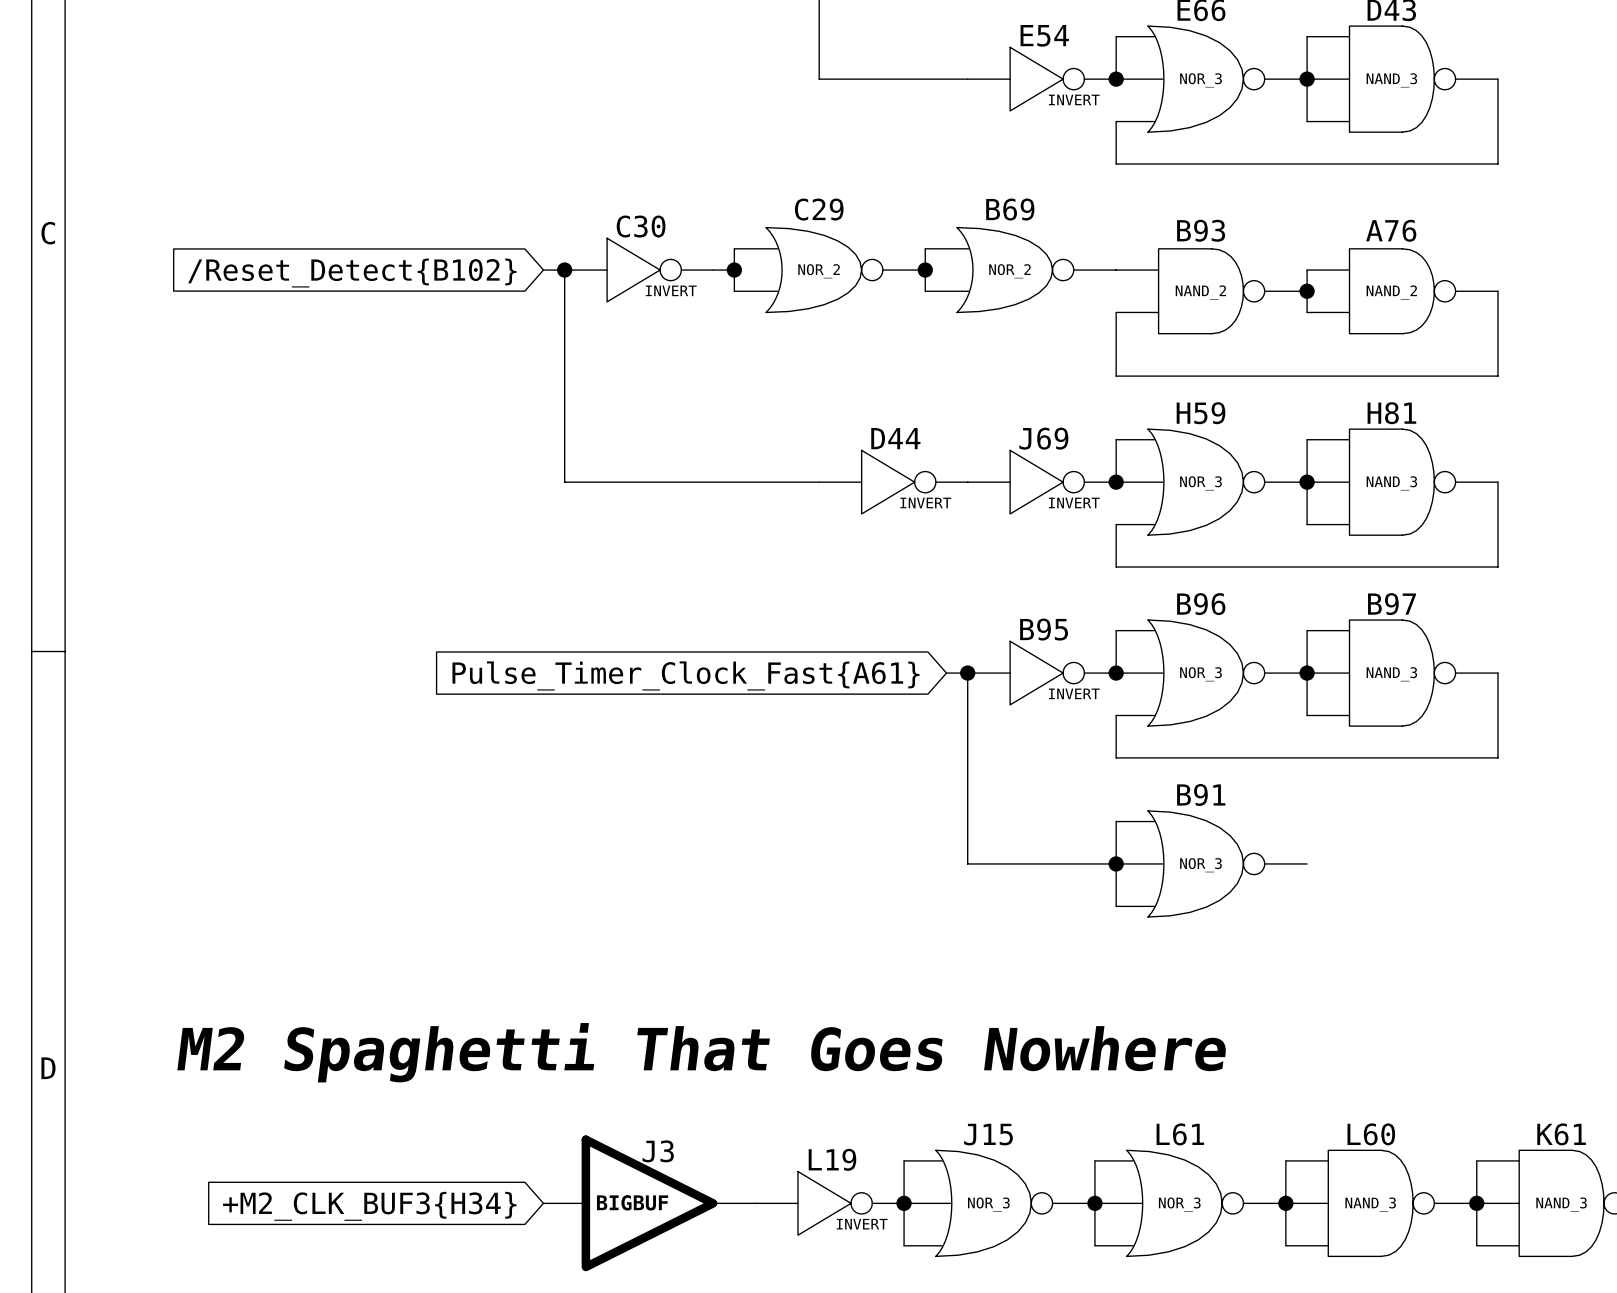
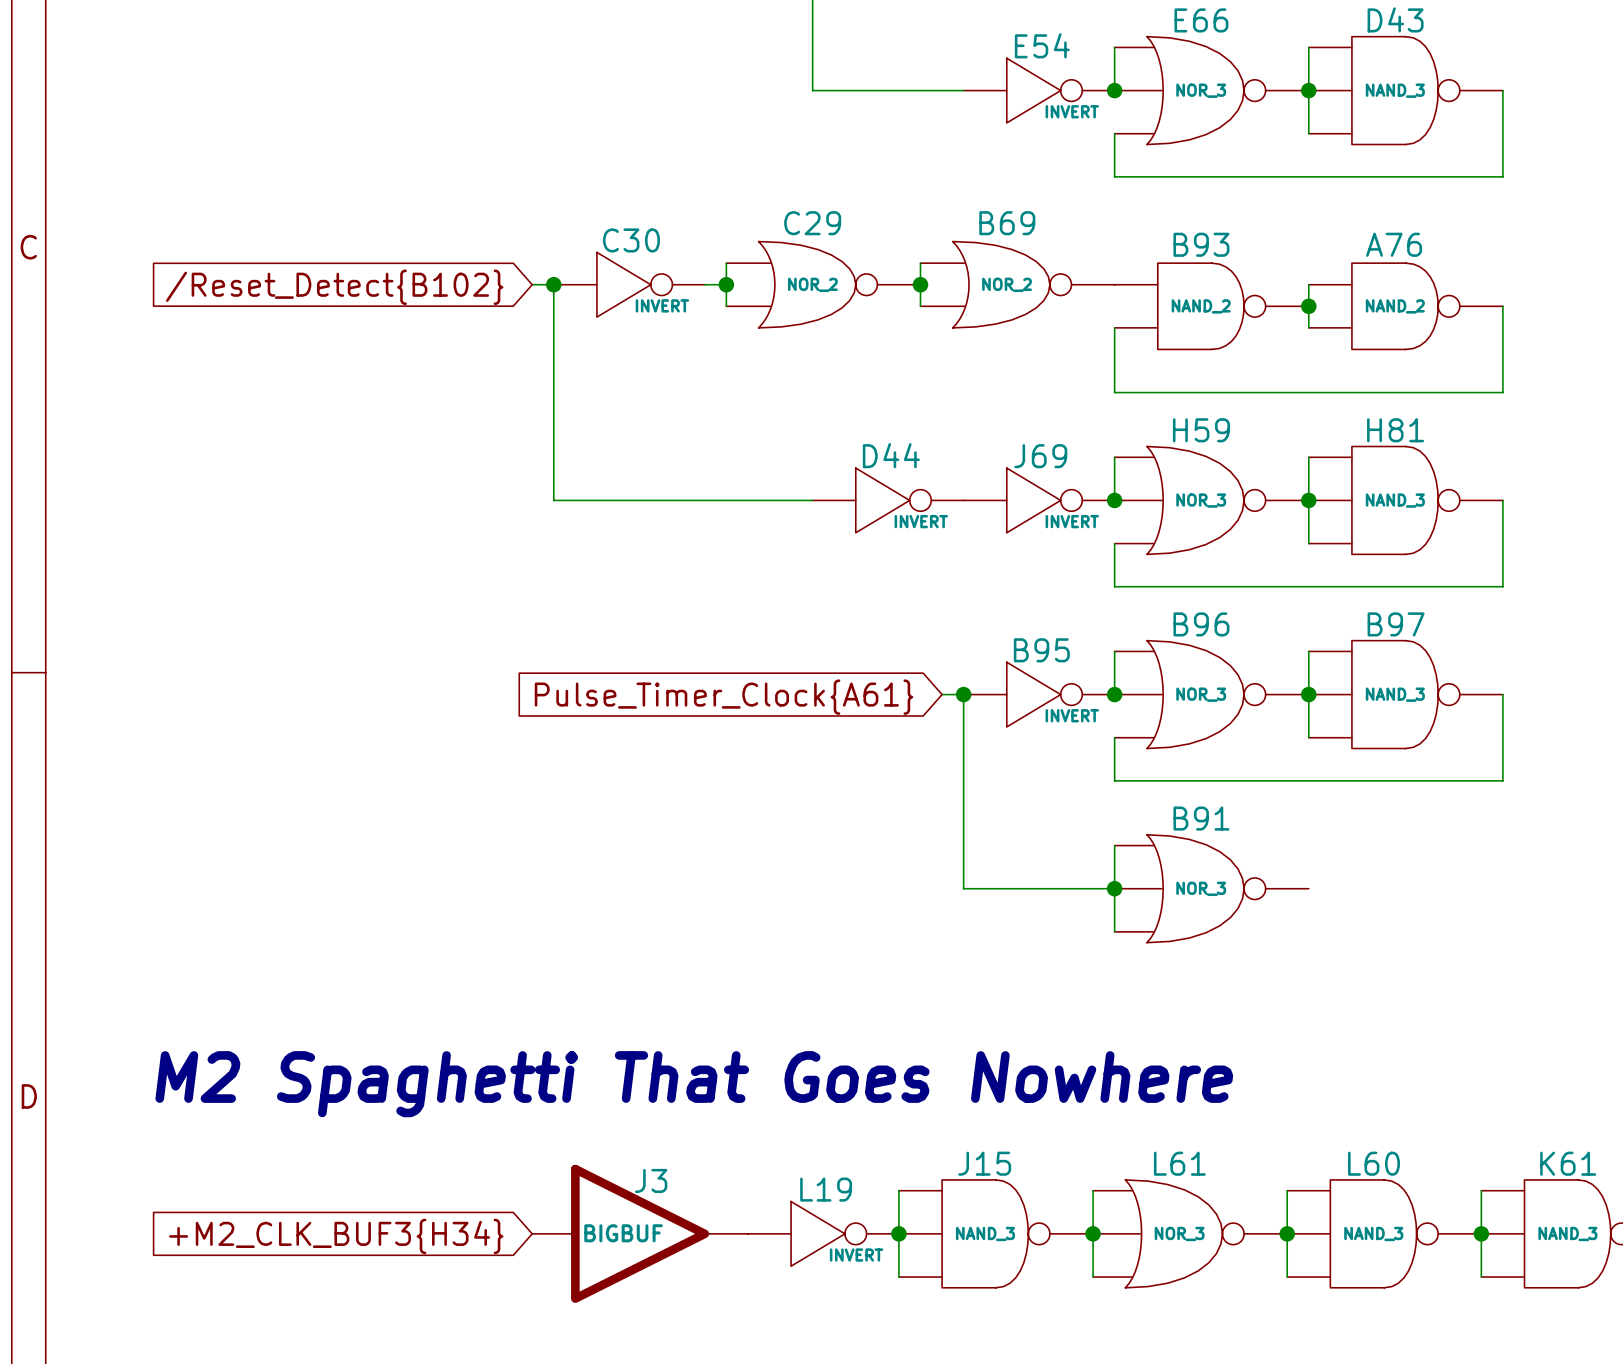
global label: Pulse_Timer_Clock_Fast{A61} (685, 675) -> Pulse_Timer_Clock{A61} (724, 697)
J15 symbol: [904, 1150, 1095, 1257] -> [898, 1179, 1094, 1288]
J15 value: NOR_3 (988, 1204) -> NAND_3 (985, 1233)

